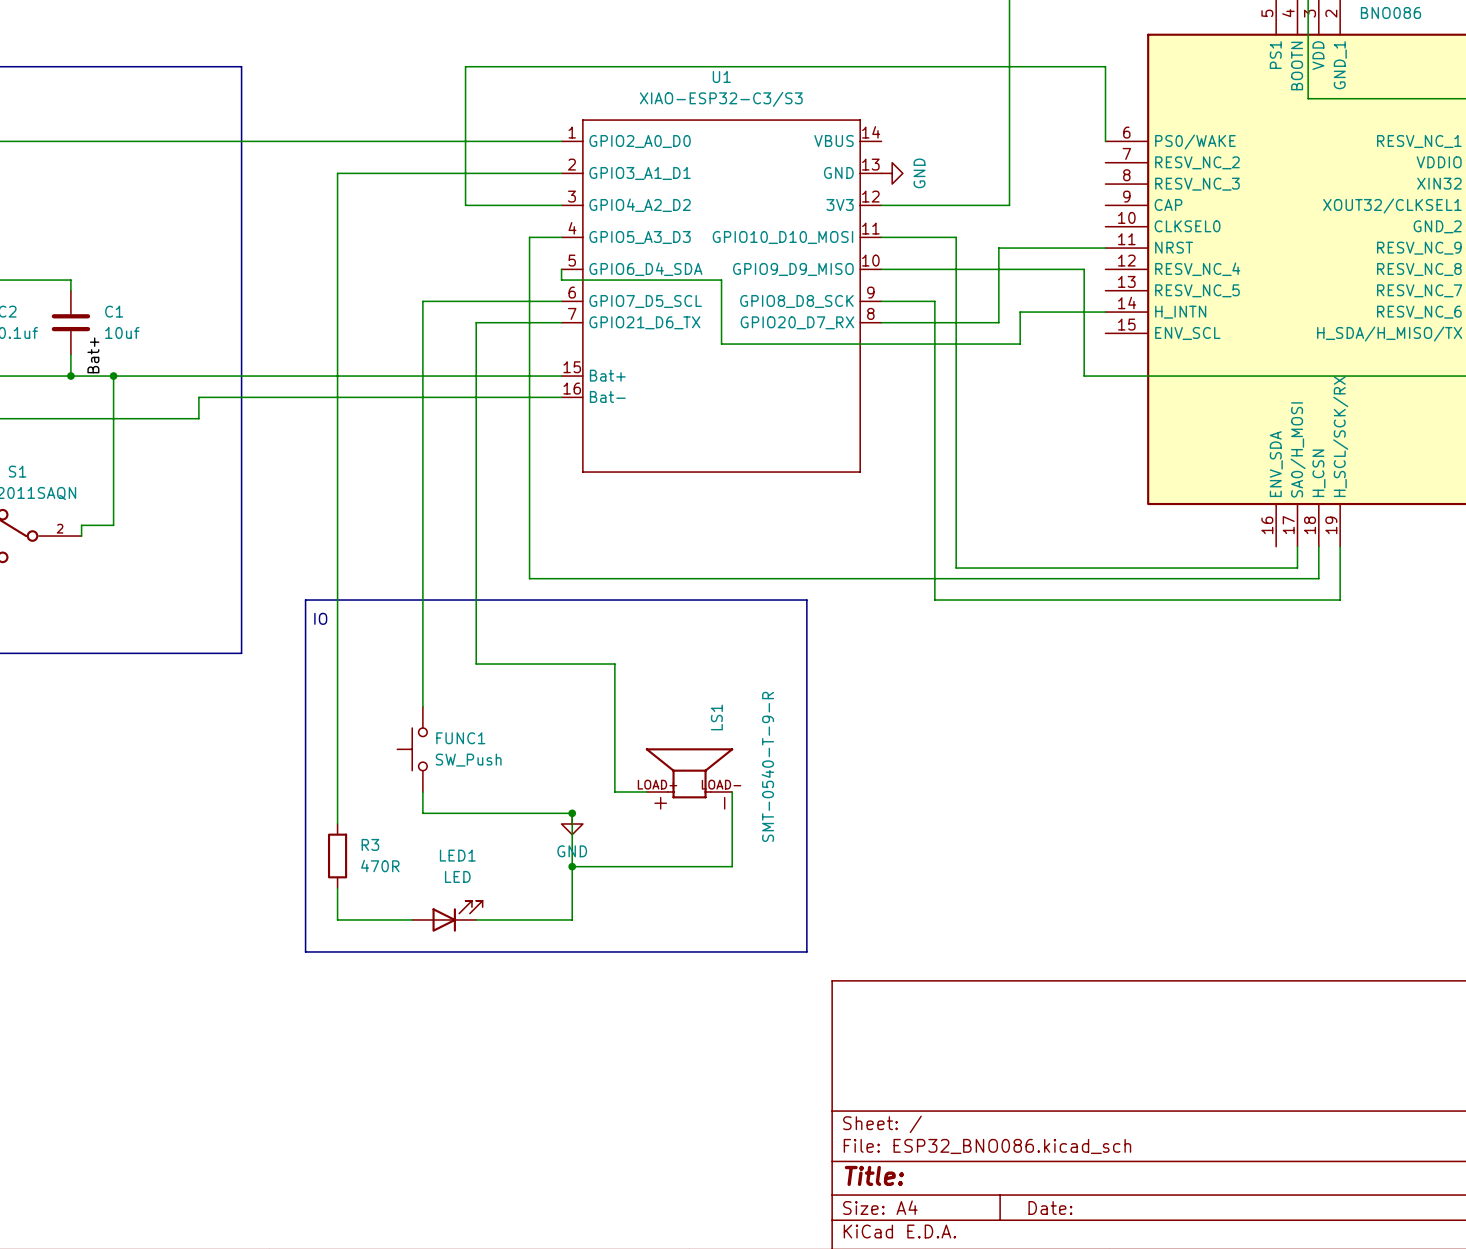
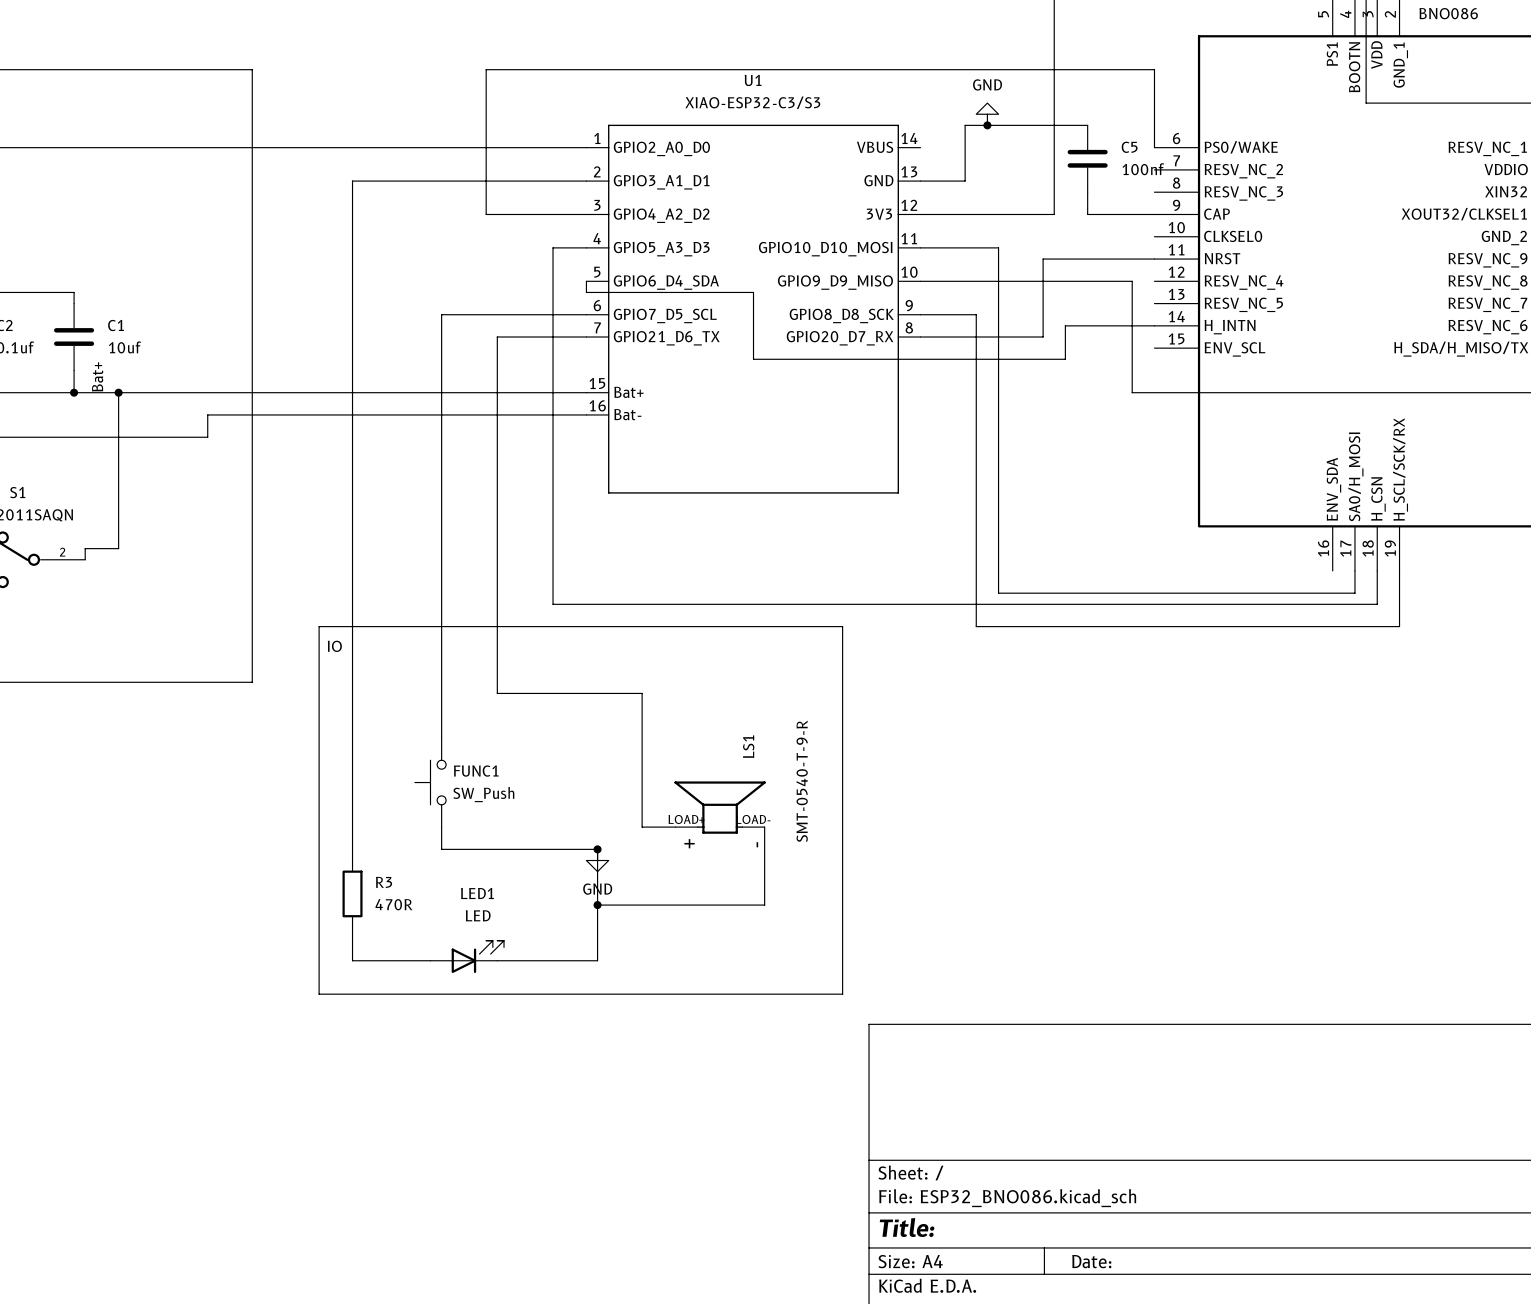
junction: none -> (987, 125)
wire: none -> (1087, 125) (965, 125) (965, 181) (920, 181)
C5: none -> 100nf (1087, 158)
power symbol rotation: 0° (892, 173) -> 90° counterclockwise (987, 114)
power symbol position: GND (892, 173) -> GND (987, 114)
wire: none -> (1087, 192) (1087, 214) (1154, 214)

